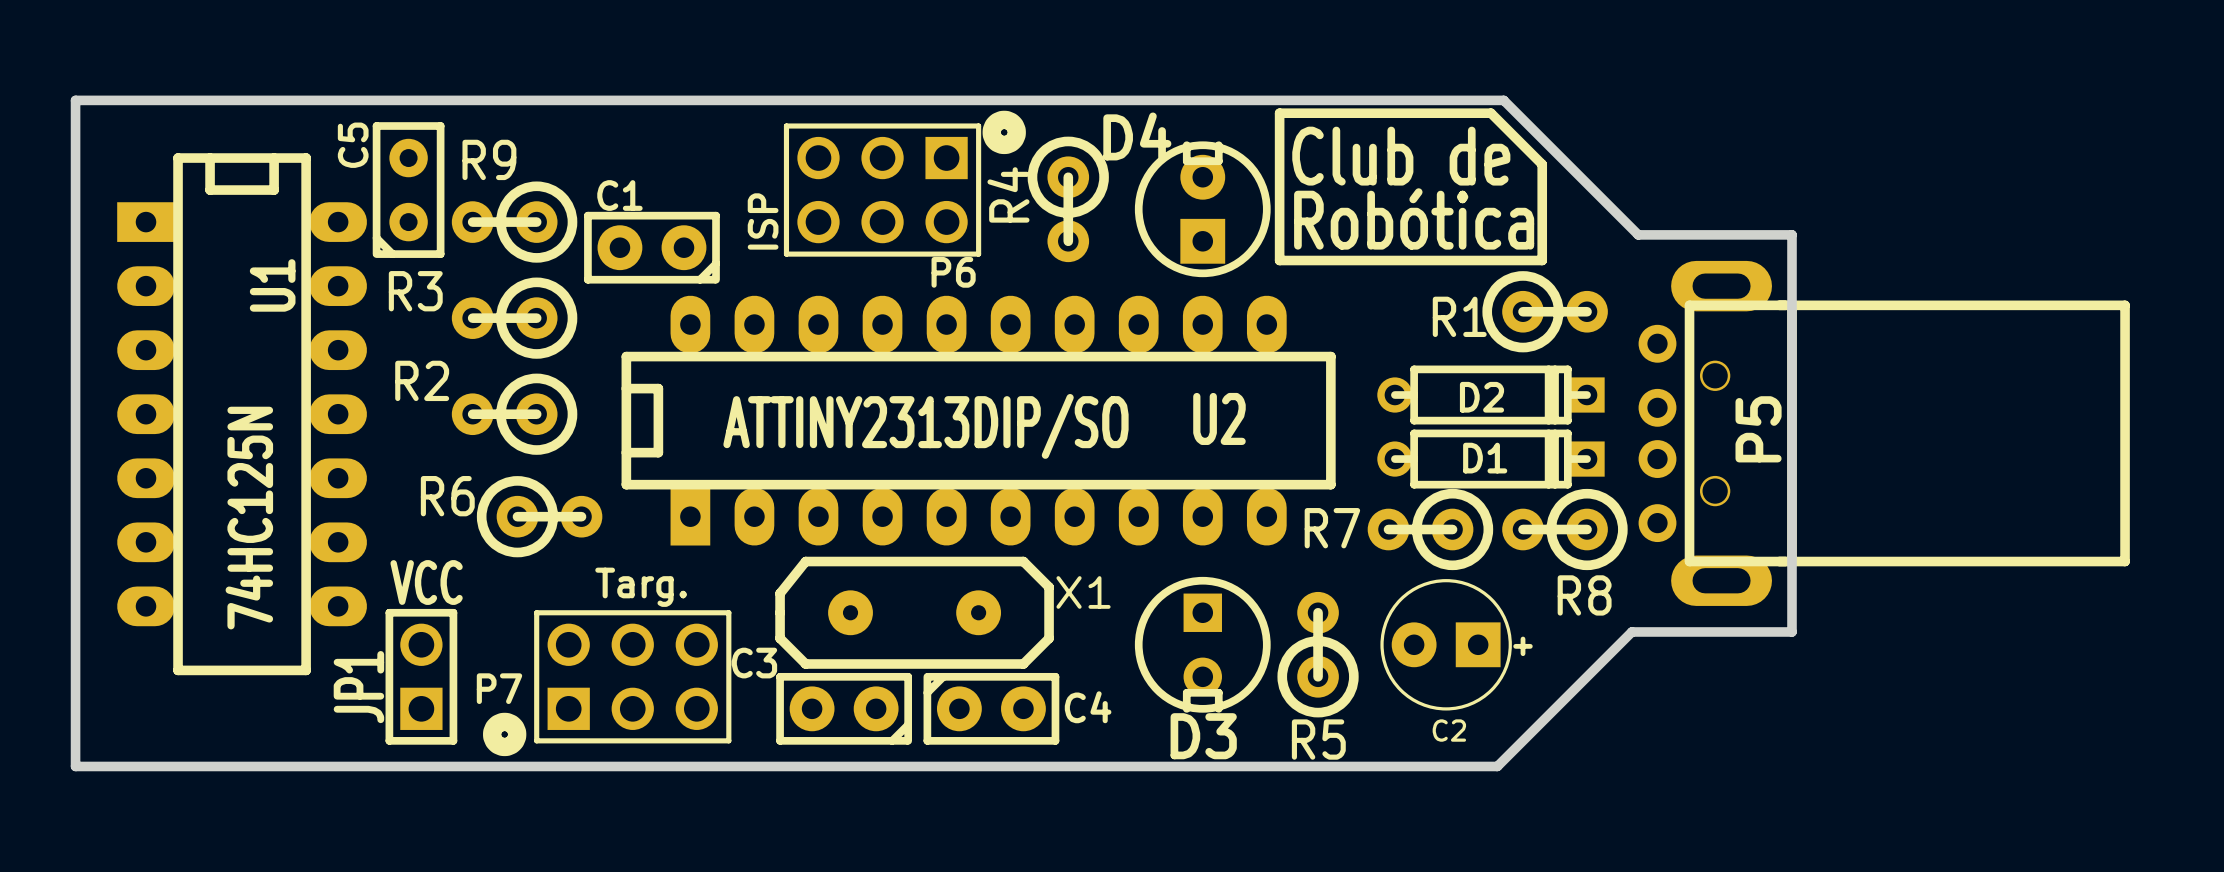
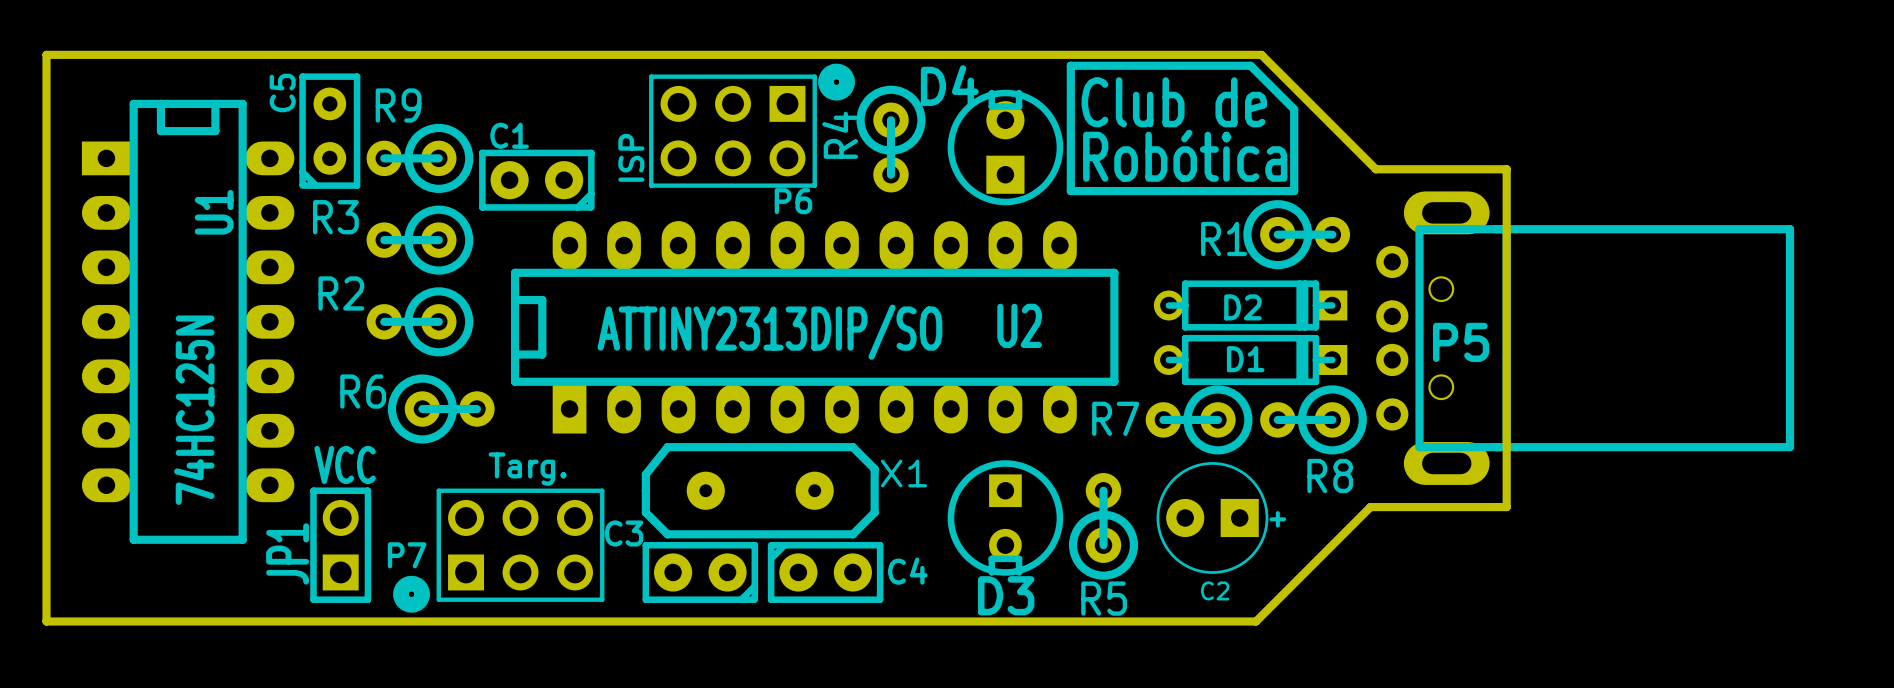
P5 name rotation: 0° (1758, 429) -> 90° clockwise (1461, 342)

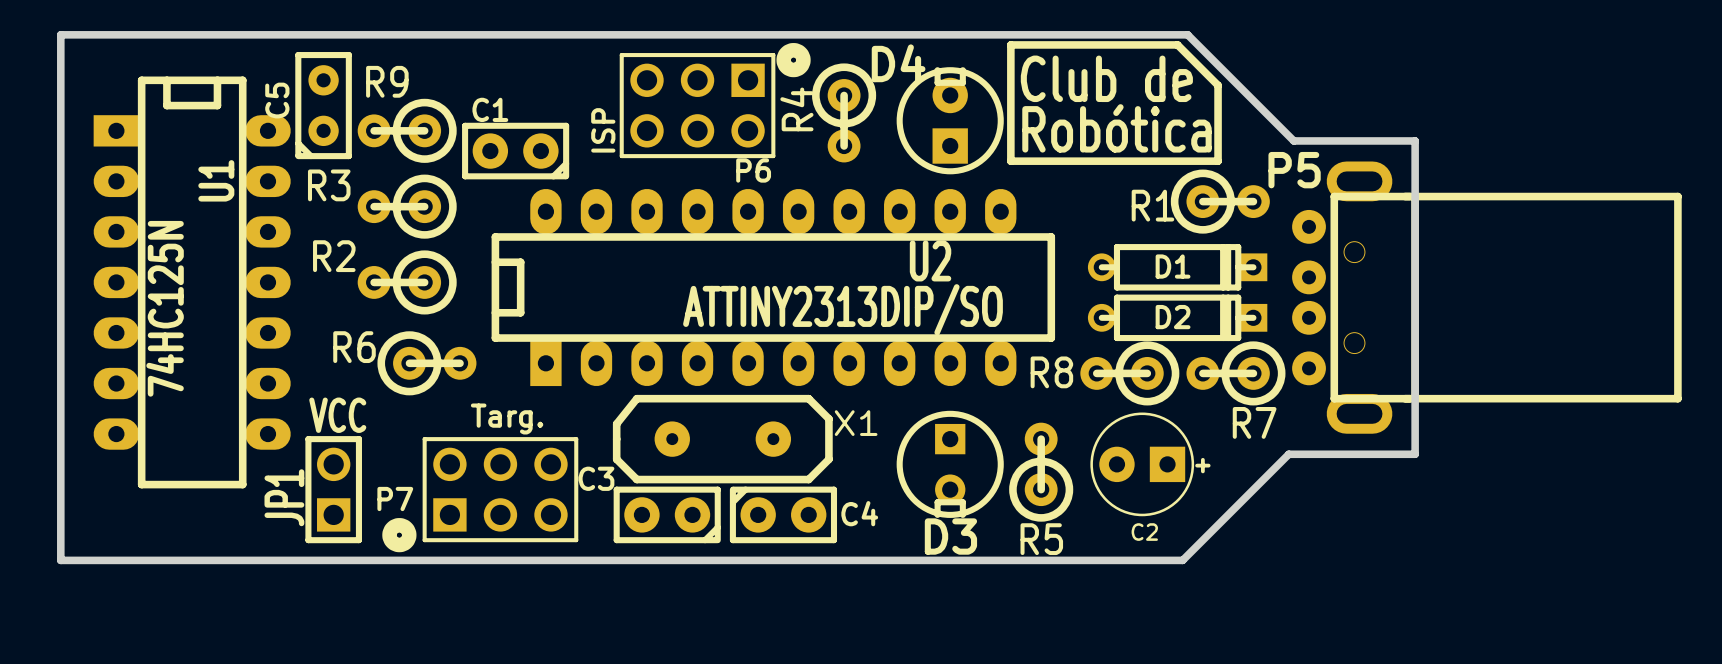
C5 name position: C5 (282, 93) -> C5 (277, 100)
P5 footprint: [1376, 191, 1795, 485] -> [1292, 161, 1682, 434]
D2 name: D2 (1242, 307) -> D1 (1173, 266)
U2 name position: U2 (1019, 325) -> U2 (930, 260)
U2 value position: ATTINY2313DIP/SO (769, 332) -> ATTINY2313DIP/SO (843, 309)
P5 name position: P5 (1461, 342) -> P5 (1294, 170)
D1 name: D1 (1245, 359) -> D2 (1173, 317)
U1 value position: 74HC125N (194, 410) -> 74HC125N (165, 308)
R7 name: R7 (1115, 418) -> R8 (1051, 372)
R8 name: R8 (1330, 475) -> R7 (1254, 422)

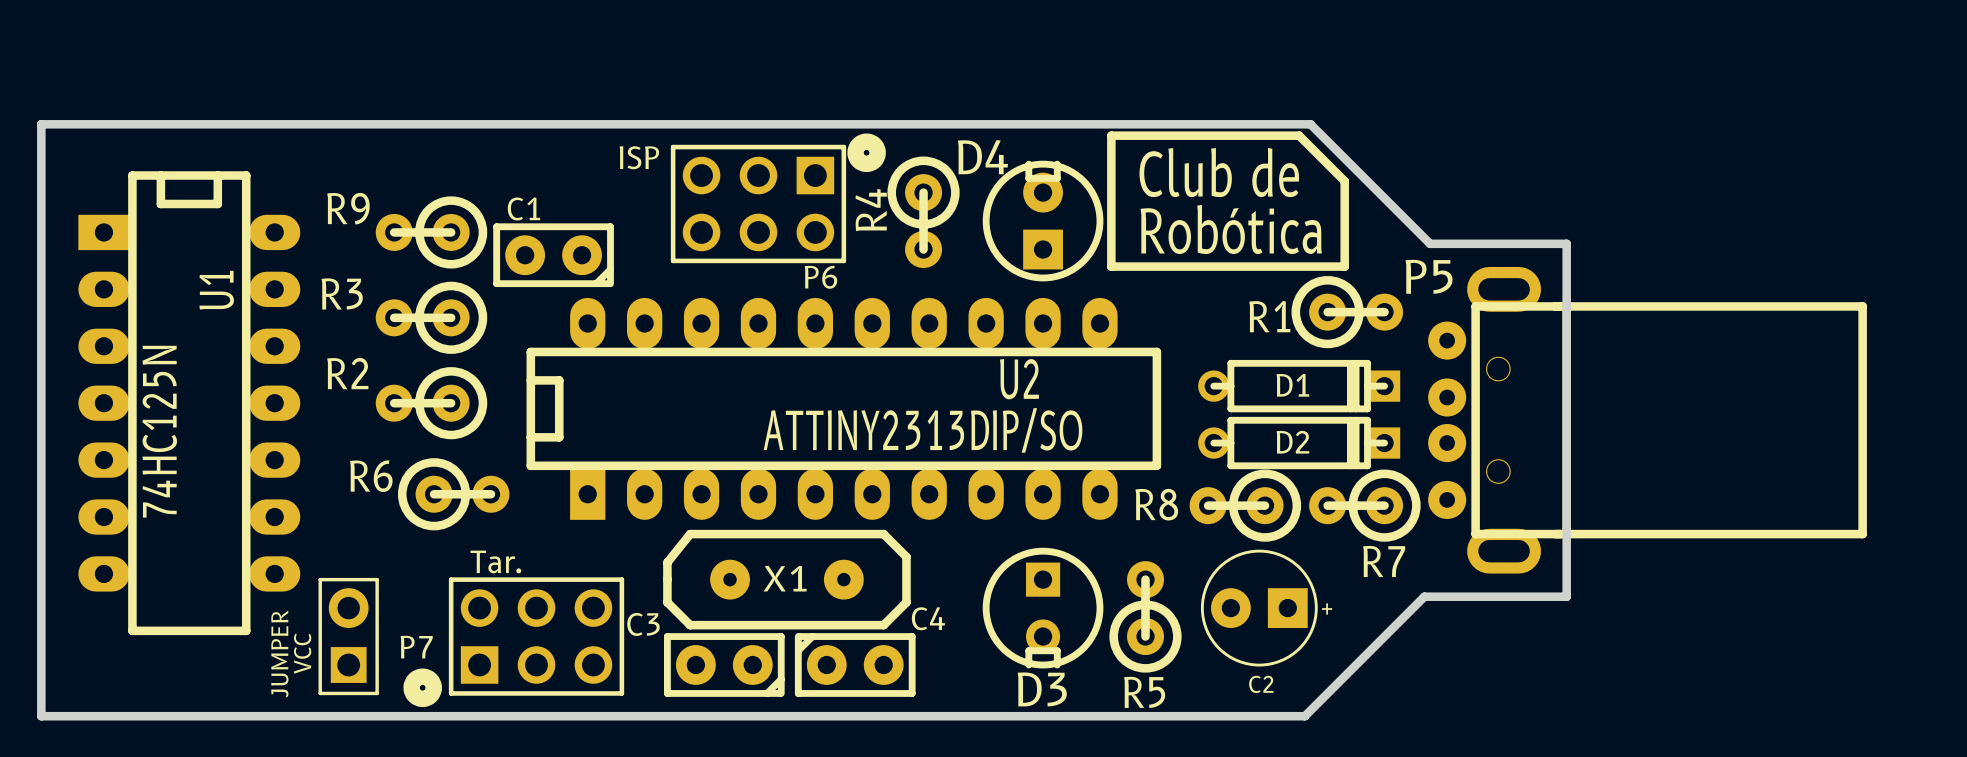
R9 name position: R9 (387, 81) -> R9 (348, 208)
C5: (323, 105) -> none
P6 value rotation: 0° (603, 130) -> 90° clockwise (639, 157)
P7 value: Targ. (507, 418) -> Tar. (495, 561)
X1 name position: X1 (856, 423) -> X1 (785, 578)
JP1: VCC (333, 489) -> none
VCC: none -> JUMPER (348, 636)
C4 name position: C4 (859, 513) -> C4 (928, 618)

